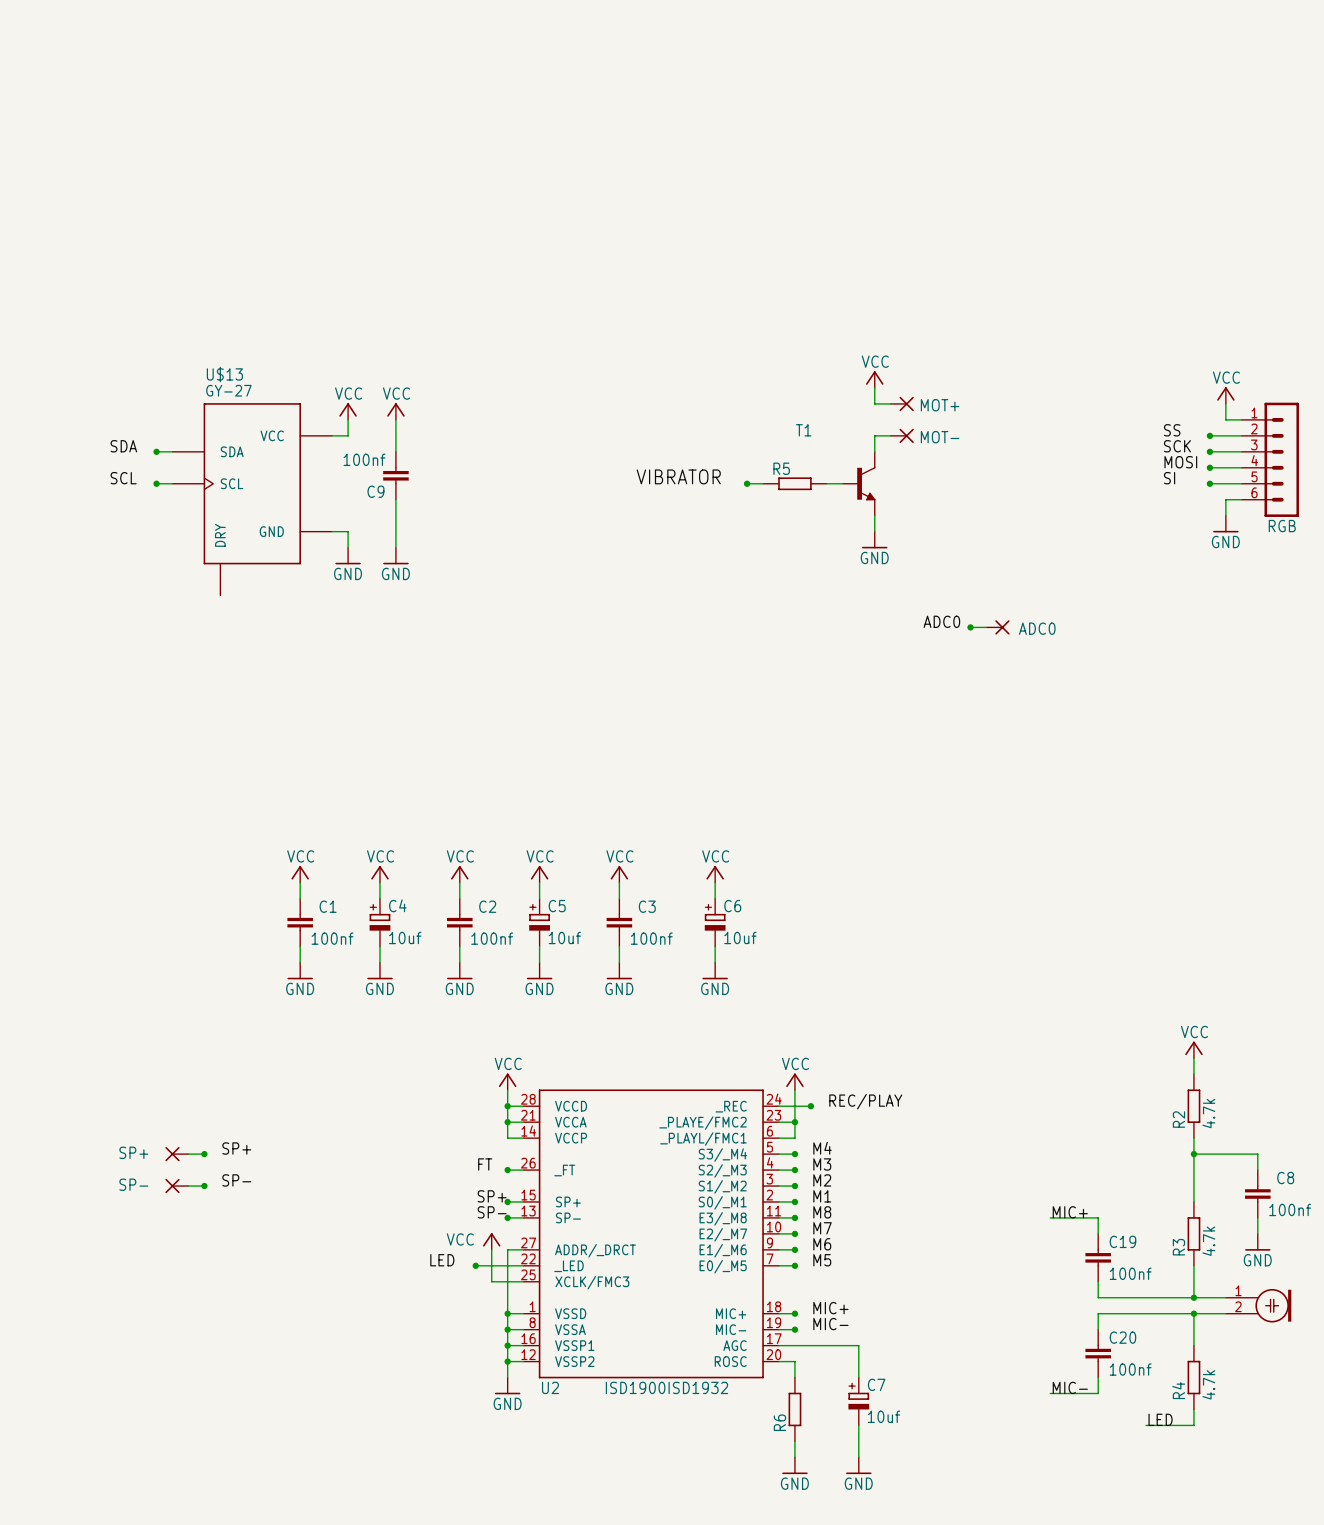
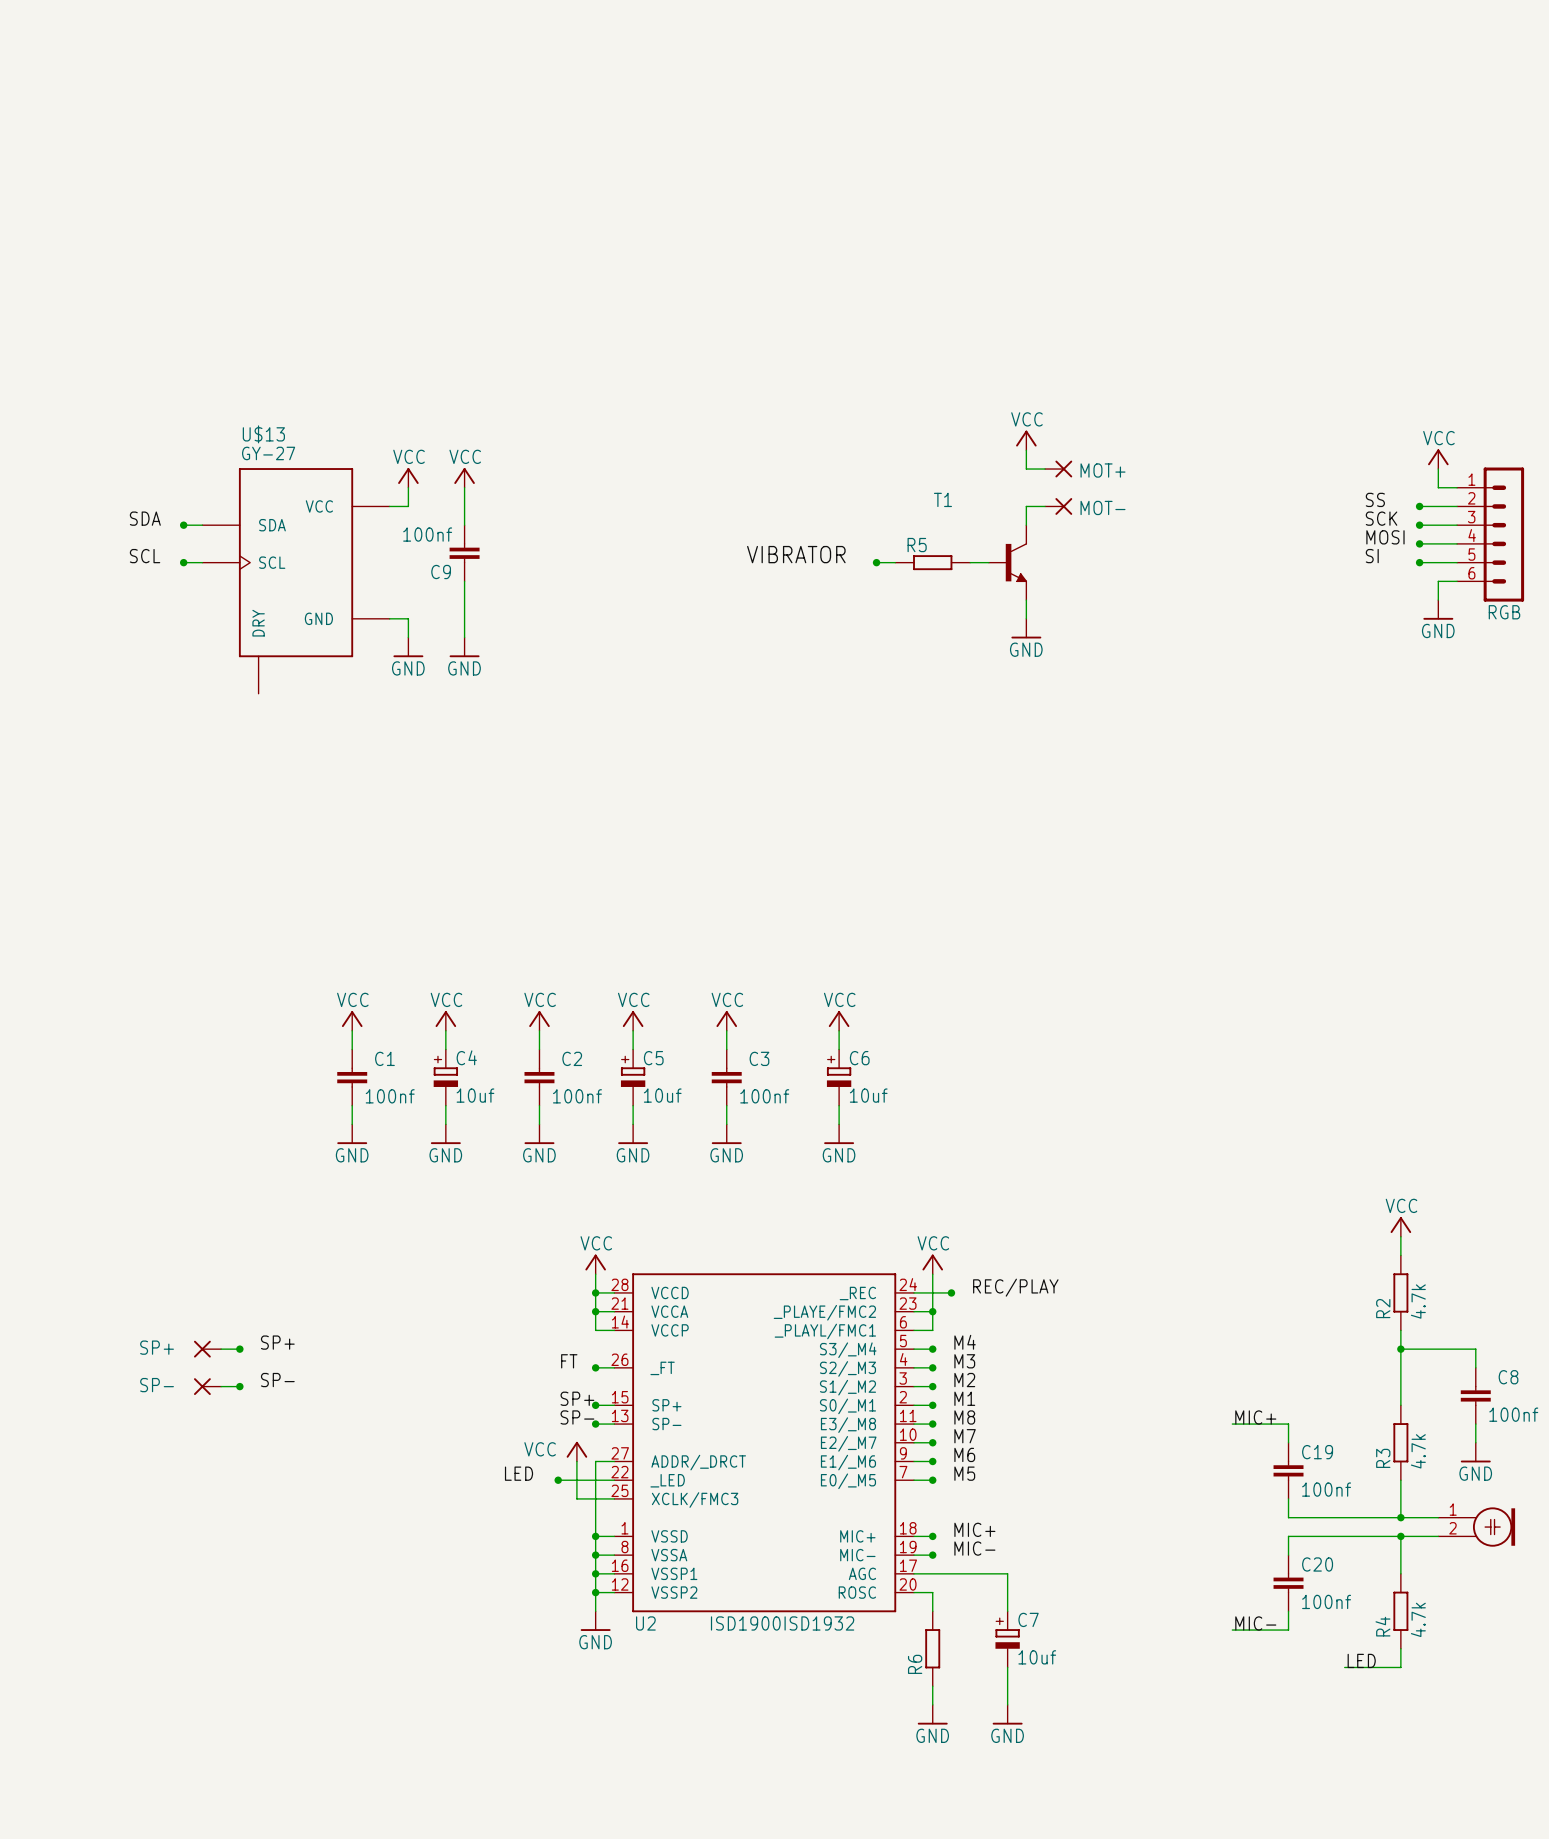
label: ADC0 (941, 621) -> none
wire: (970, 627) (986, 627) -> none
junction: (970, 627) -> none
ADC0: (998, 627) -> none

